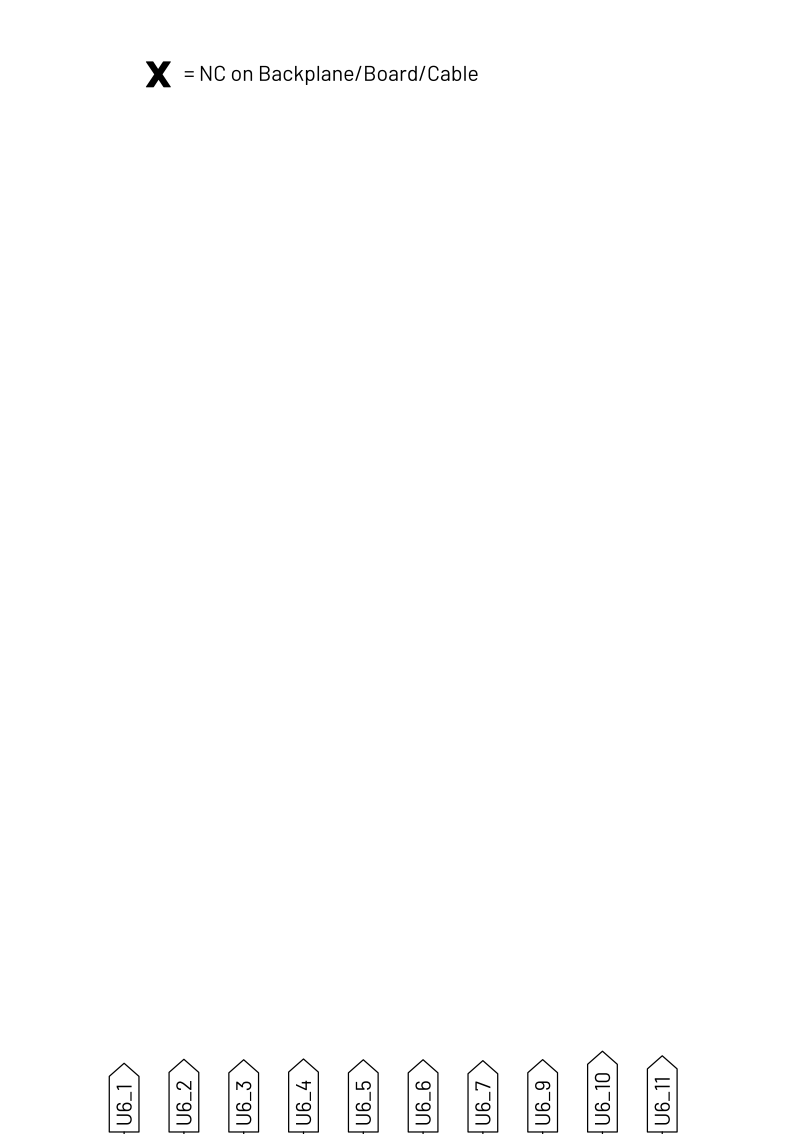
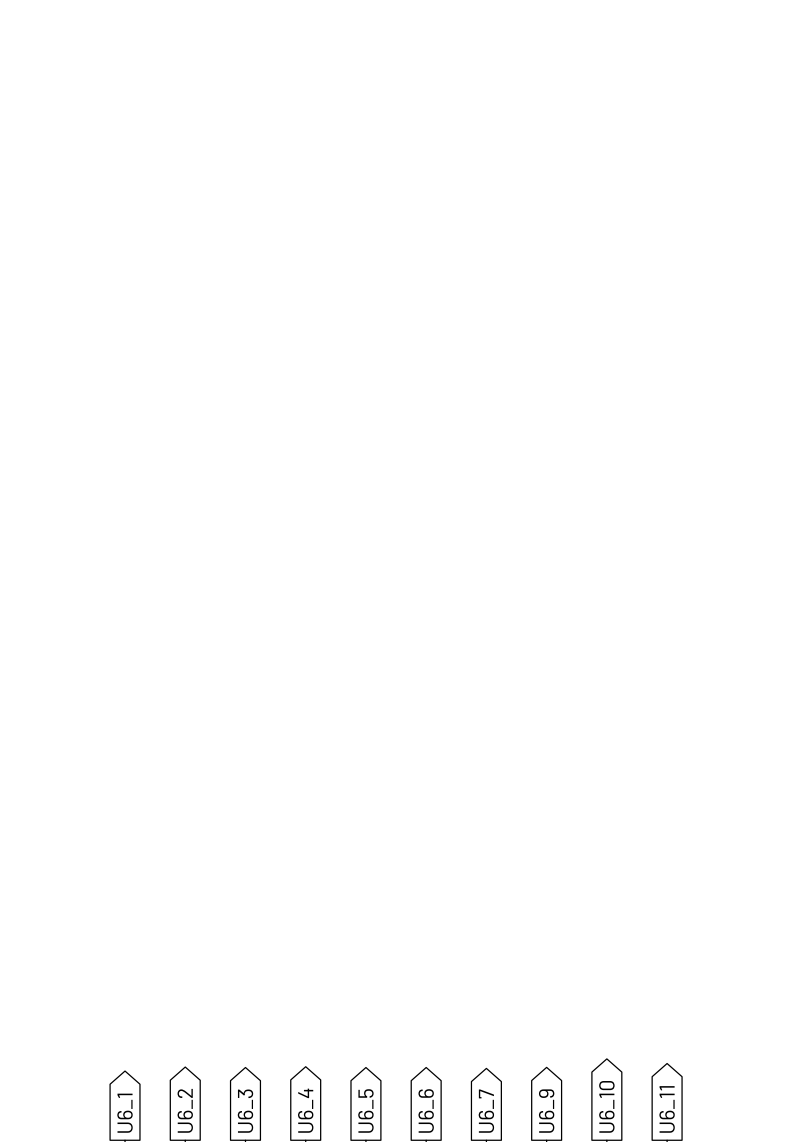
text: x (158, 74) -> none
text: = NC on Backplane/Board/Cable (331, 75) -> none

